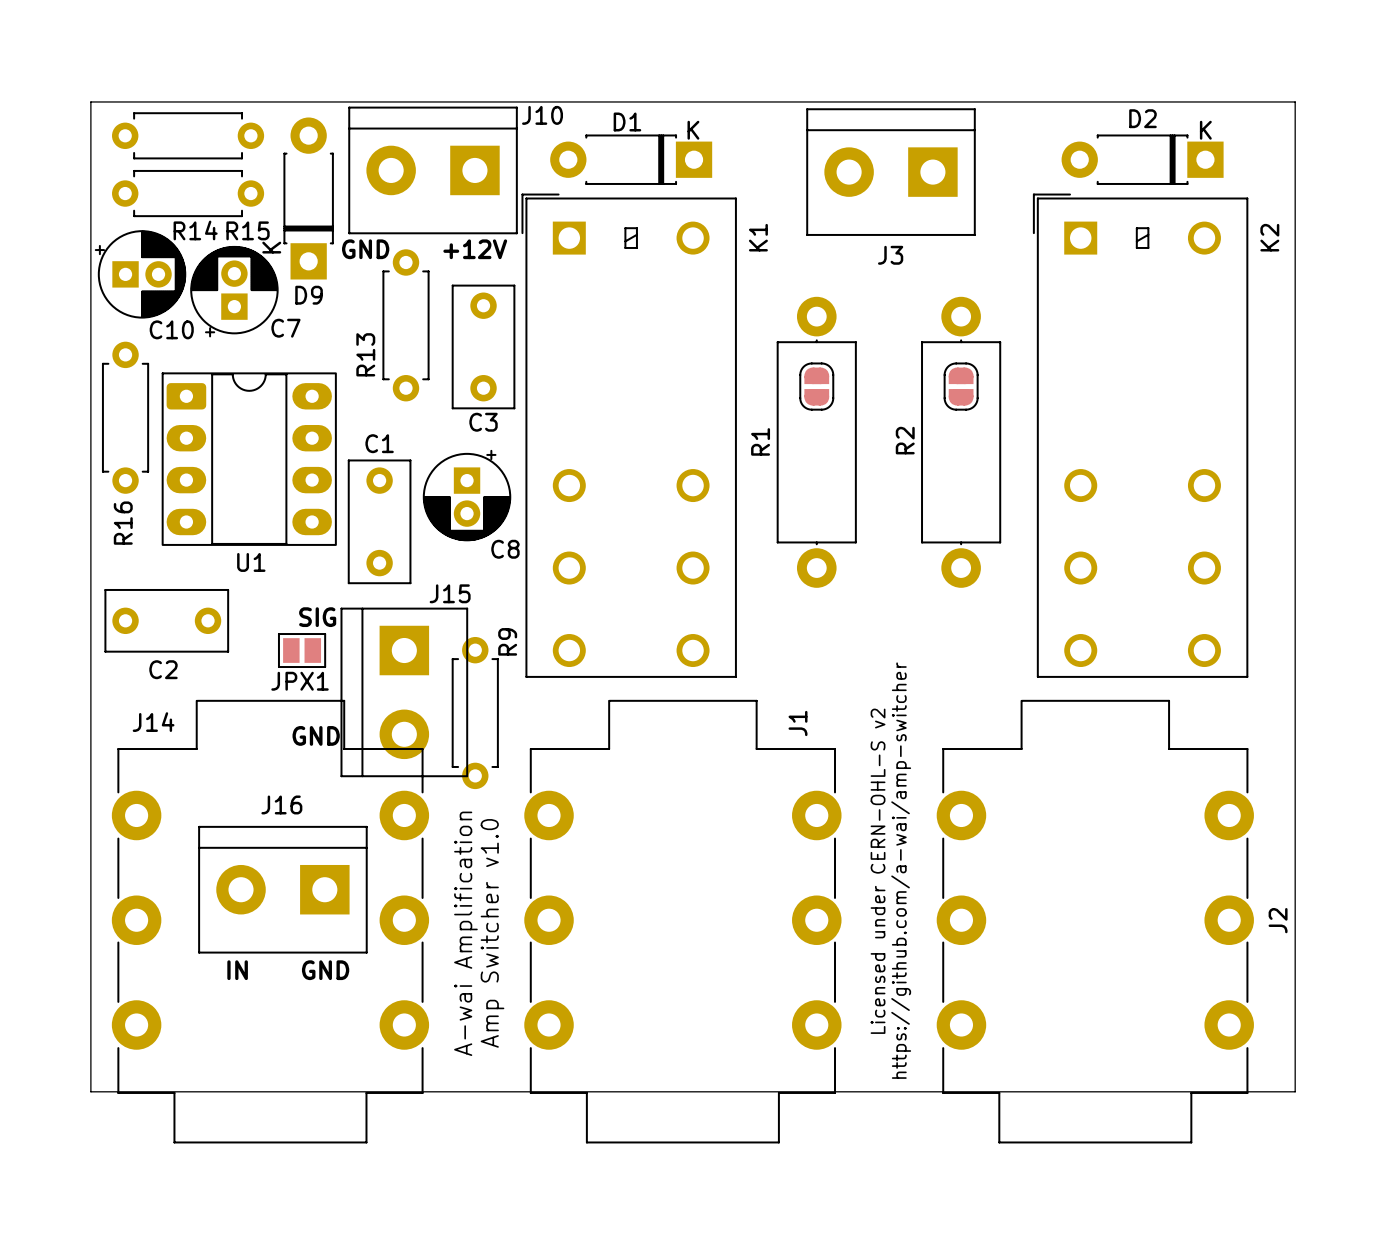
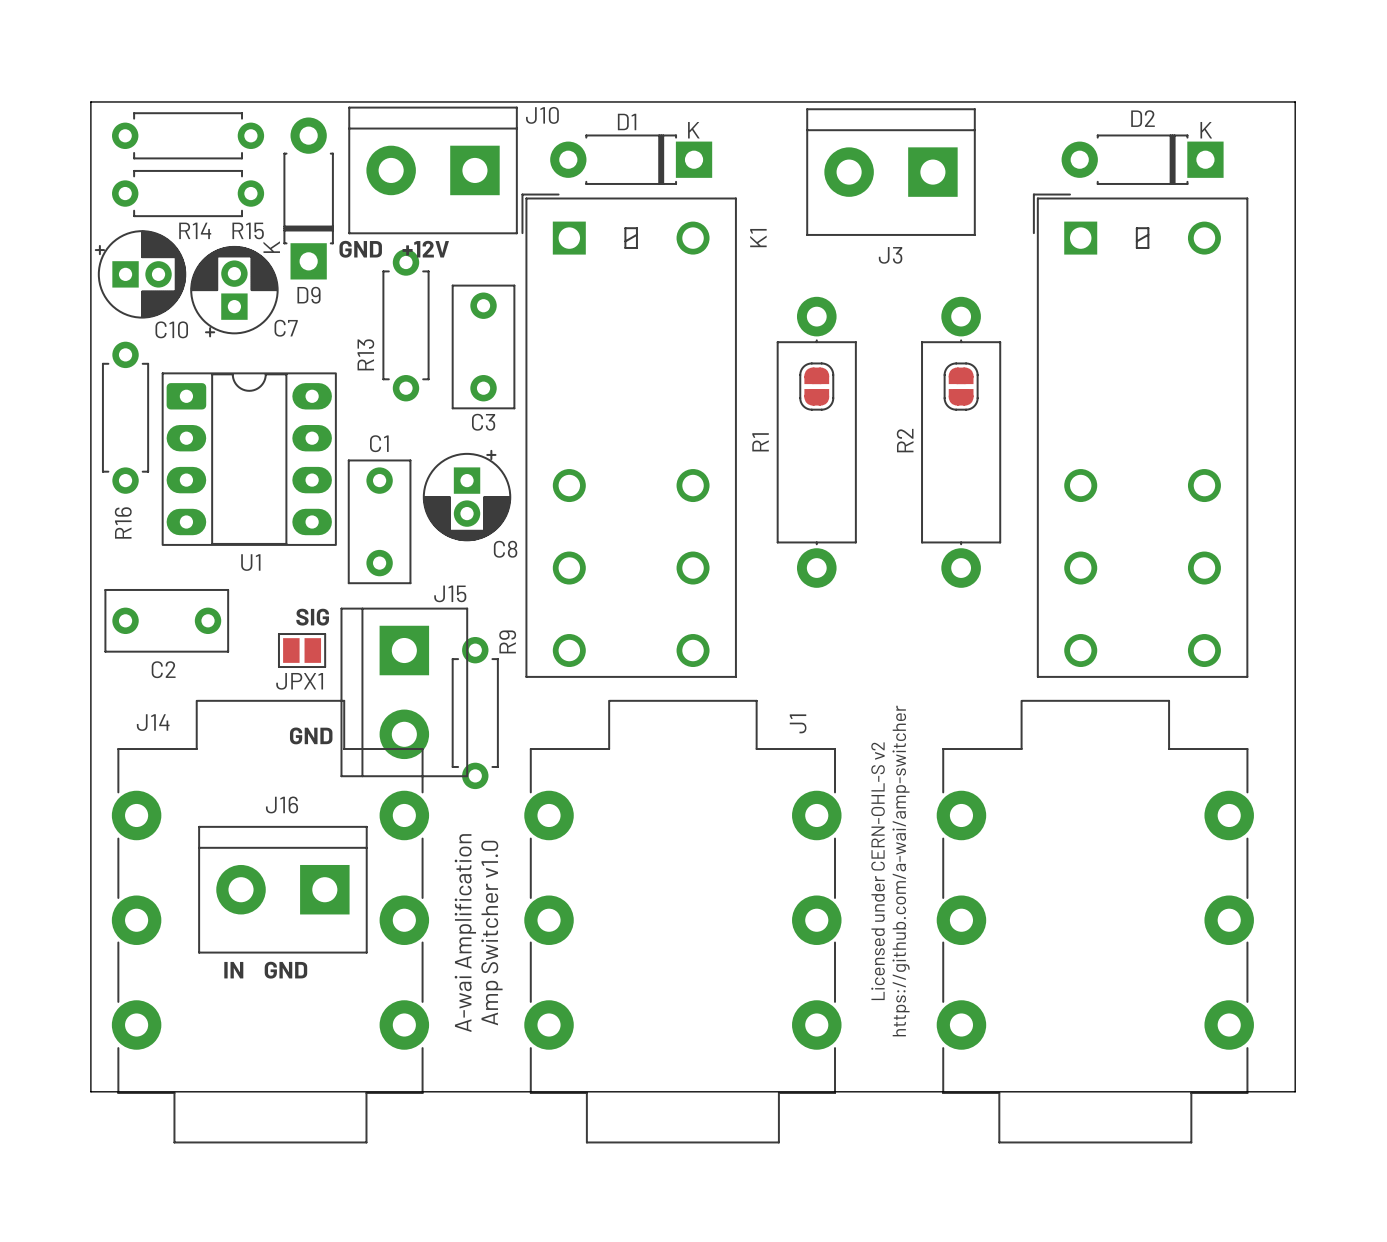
K2 name: K2 (1269, 237) -> none
J2 name: J2 (1278, 920) -> none

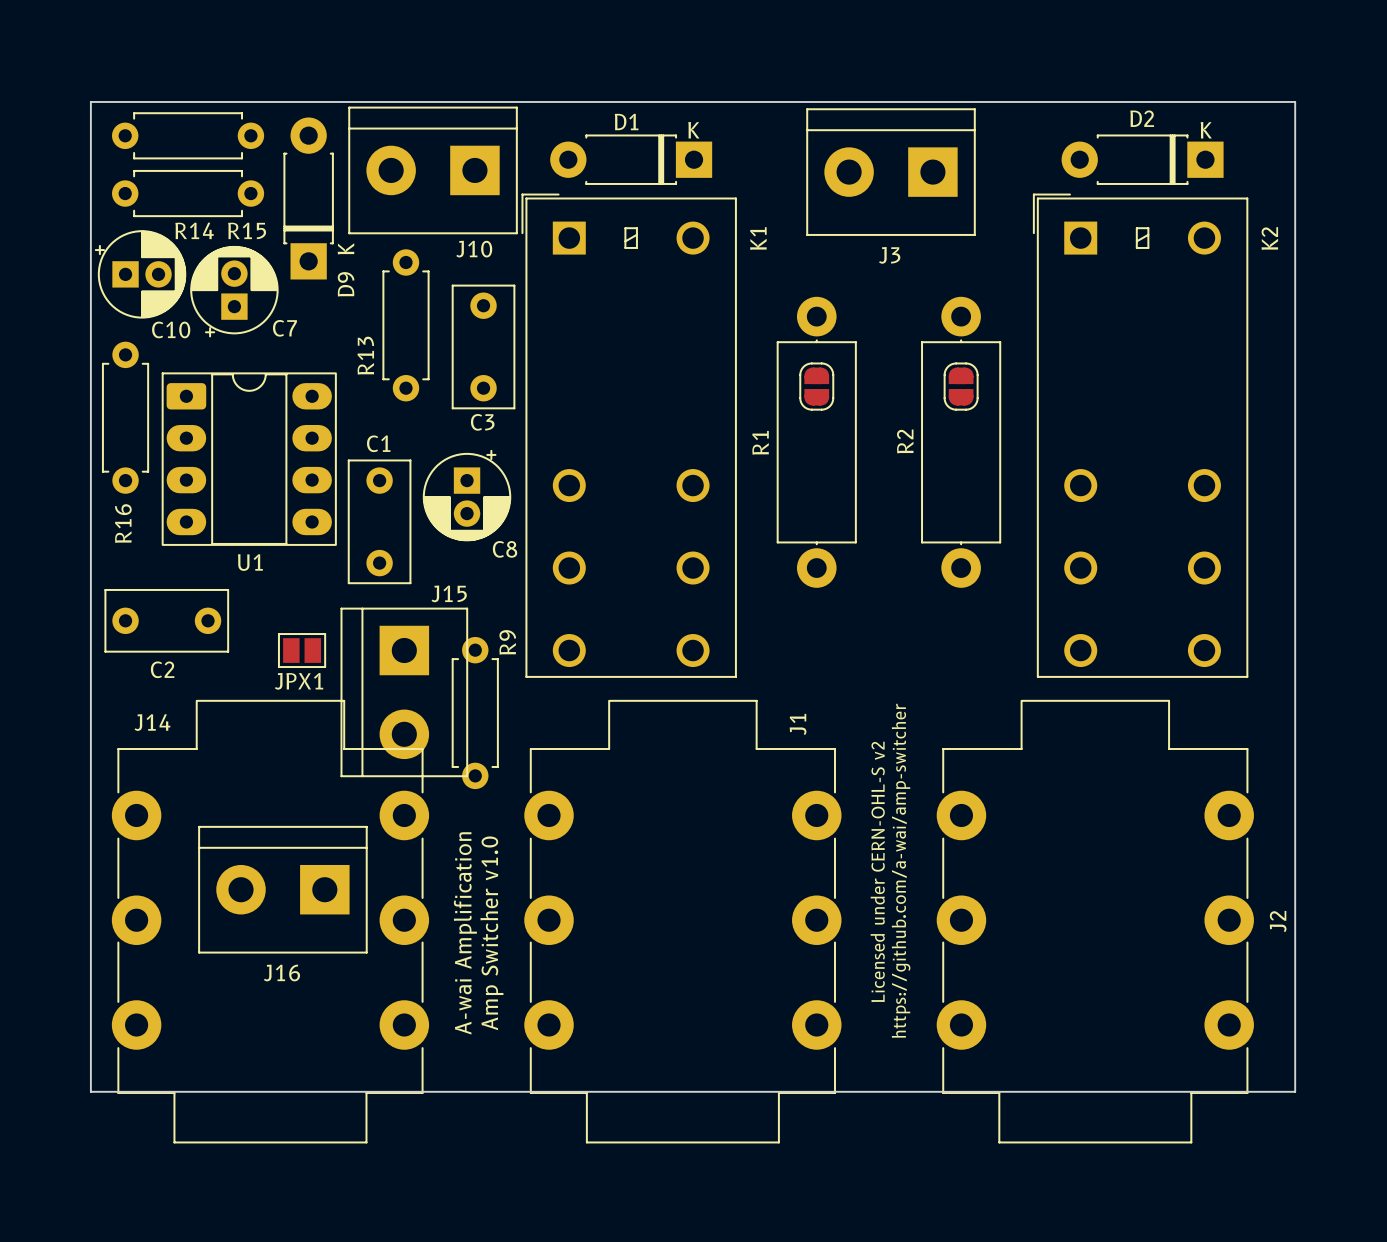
J10 name position: J10 (542, 115) -> J10 (474, 249)
K2 name: none -> K2 (1269, 238)
D9 text position: K (271, 247) -> K (345, 248)
text: GND +12V (394, 249) -> none
D9 name rotation: 0° (309, 295) -> 90° counterclockwise (346, 284)
text: SIG (312, 617) -> none
text: GND (311, 735) -> none
J16 name position: J16 (282, 804) -> J16 (281, 973)
J2 name: none -> J2 (1278, 921)
text: IN GND (265, 970) -> none

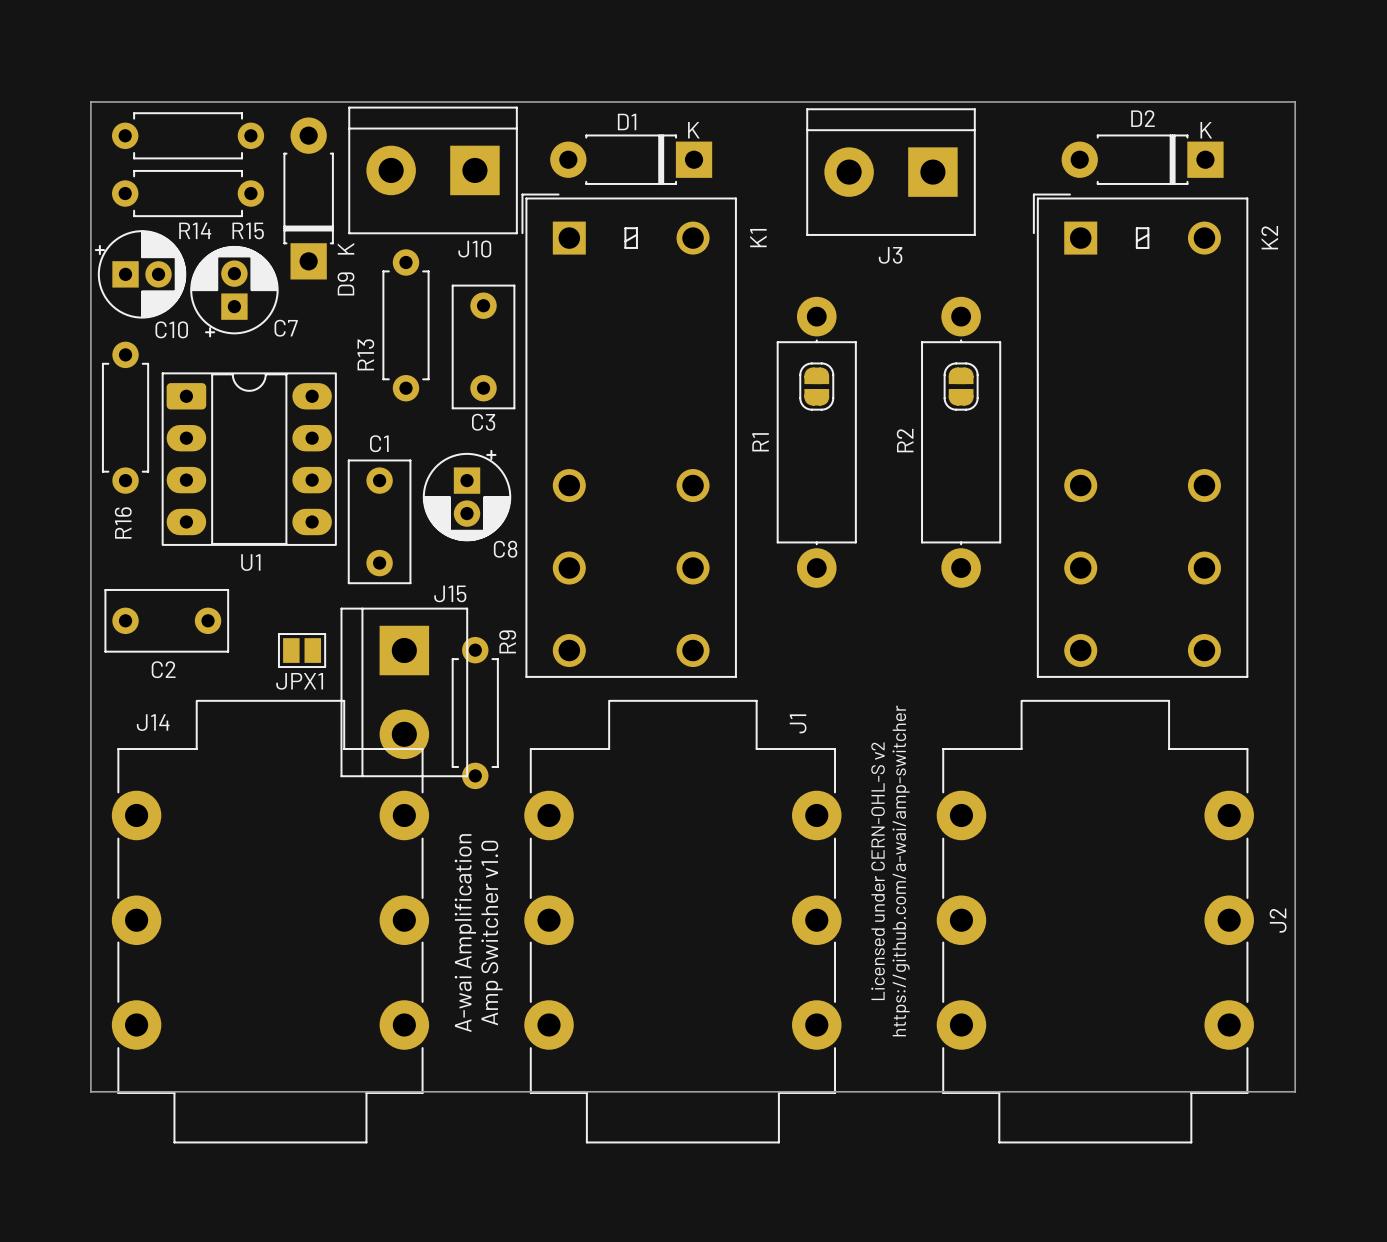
J16: (282, 889) -> none

